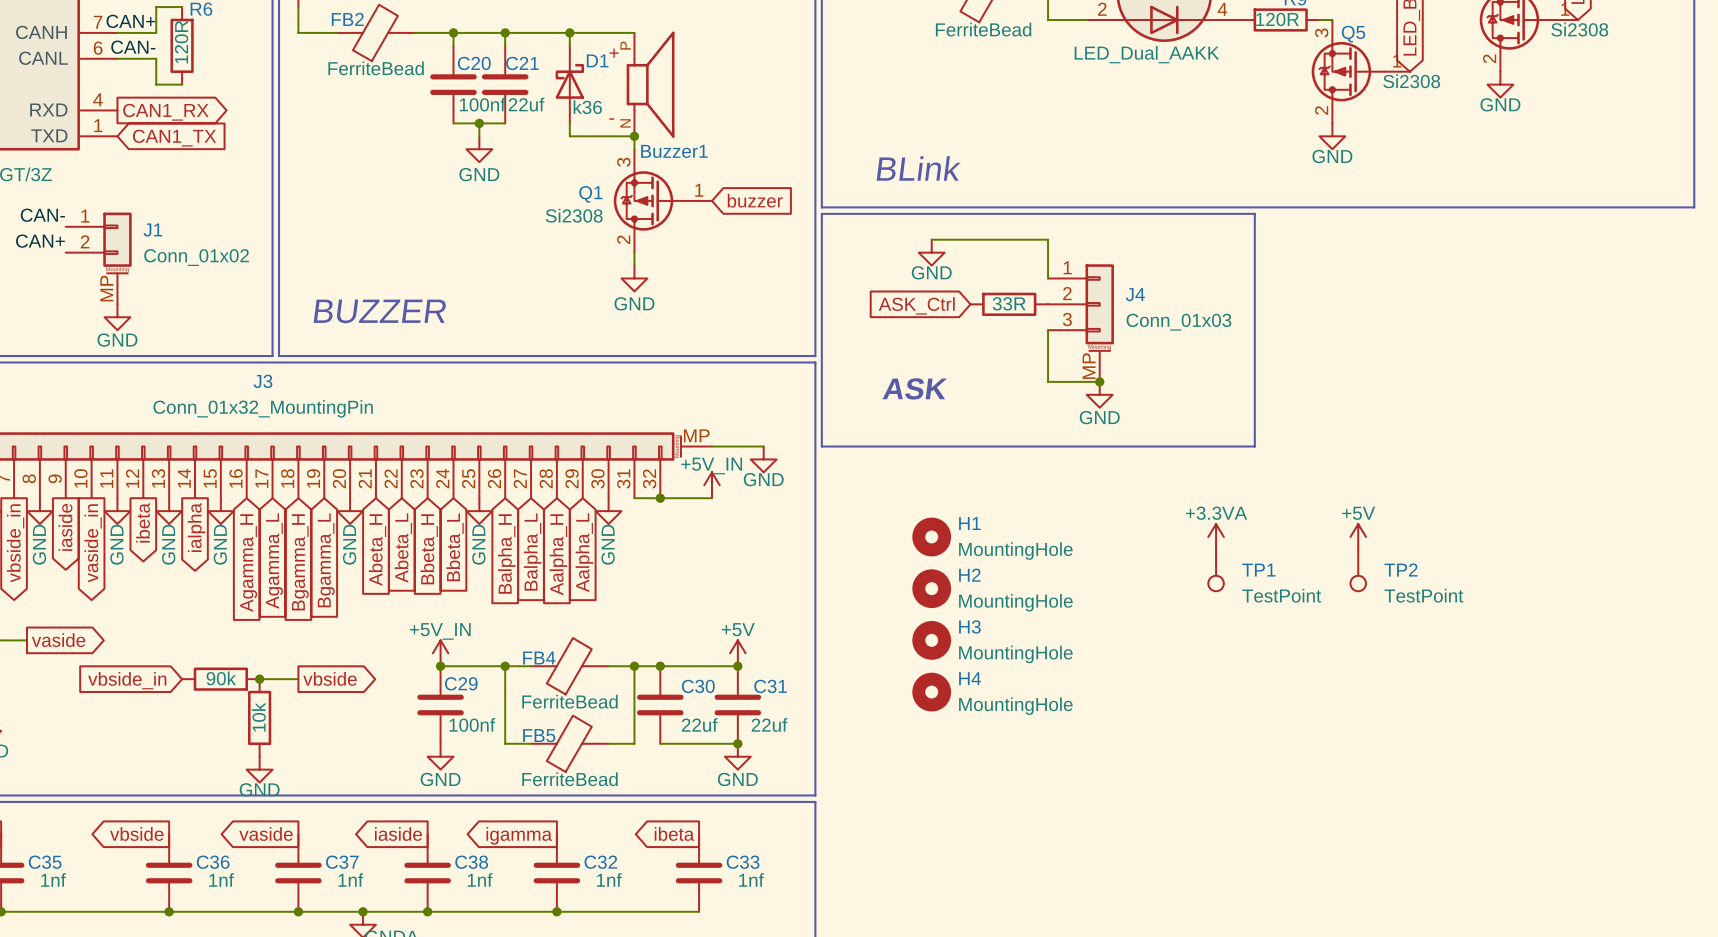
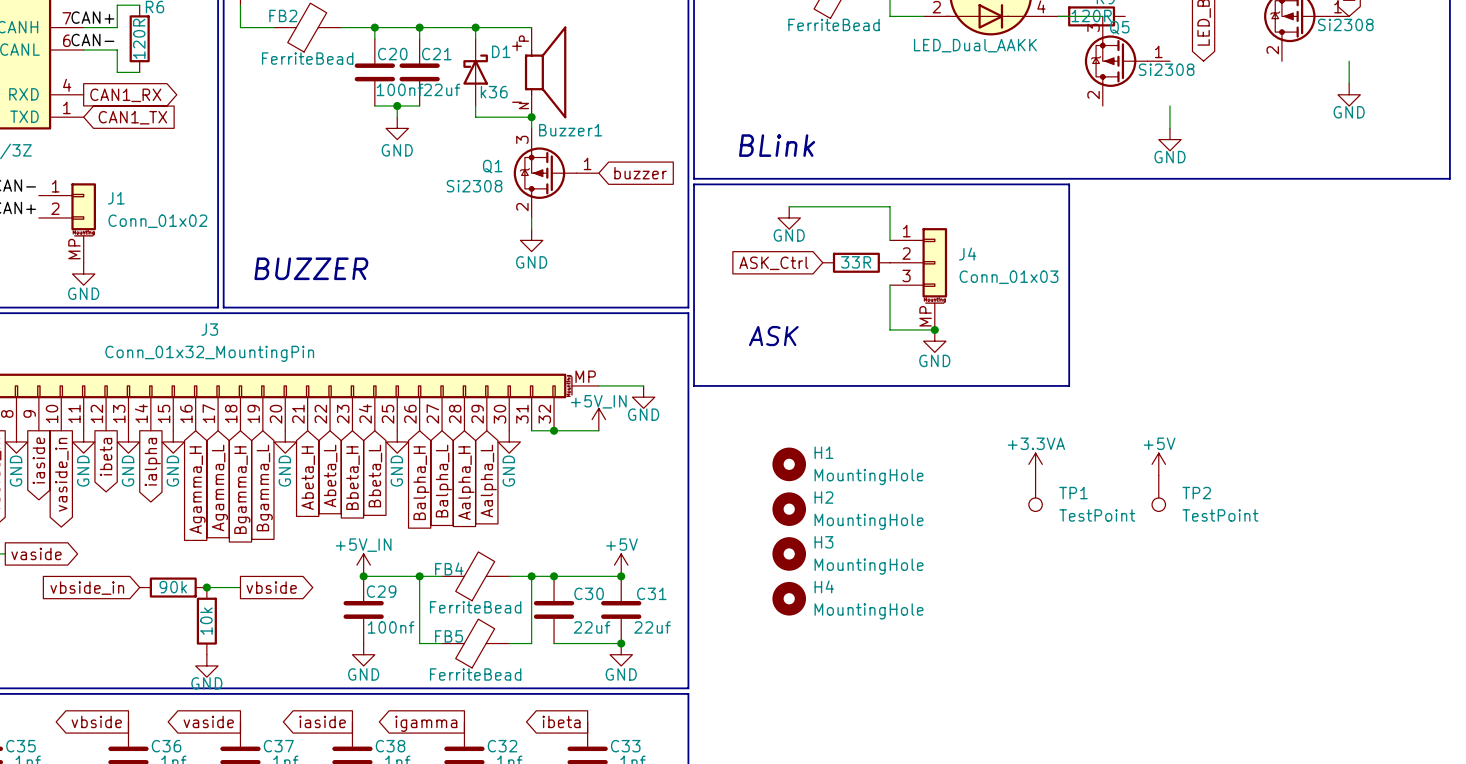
wire: none -> (1057, 16) (1102, 16)
wire: (1319, 19) (1332, 19) -> none
Q5 position: (1360, 71) -> (1127, 61)
wire: none -> (1349, 61) (1349, 83)
power symbol: GND (1500, 84) -> none
power symbol: none -> GND (1349, 94)
wire: none -> (1169, 105) (1169, 128)
power symbol position: GND (1332, 136) -> GND (1169, 139)

